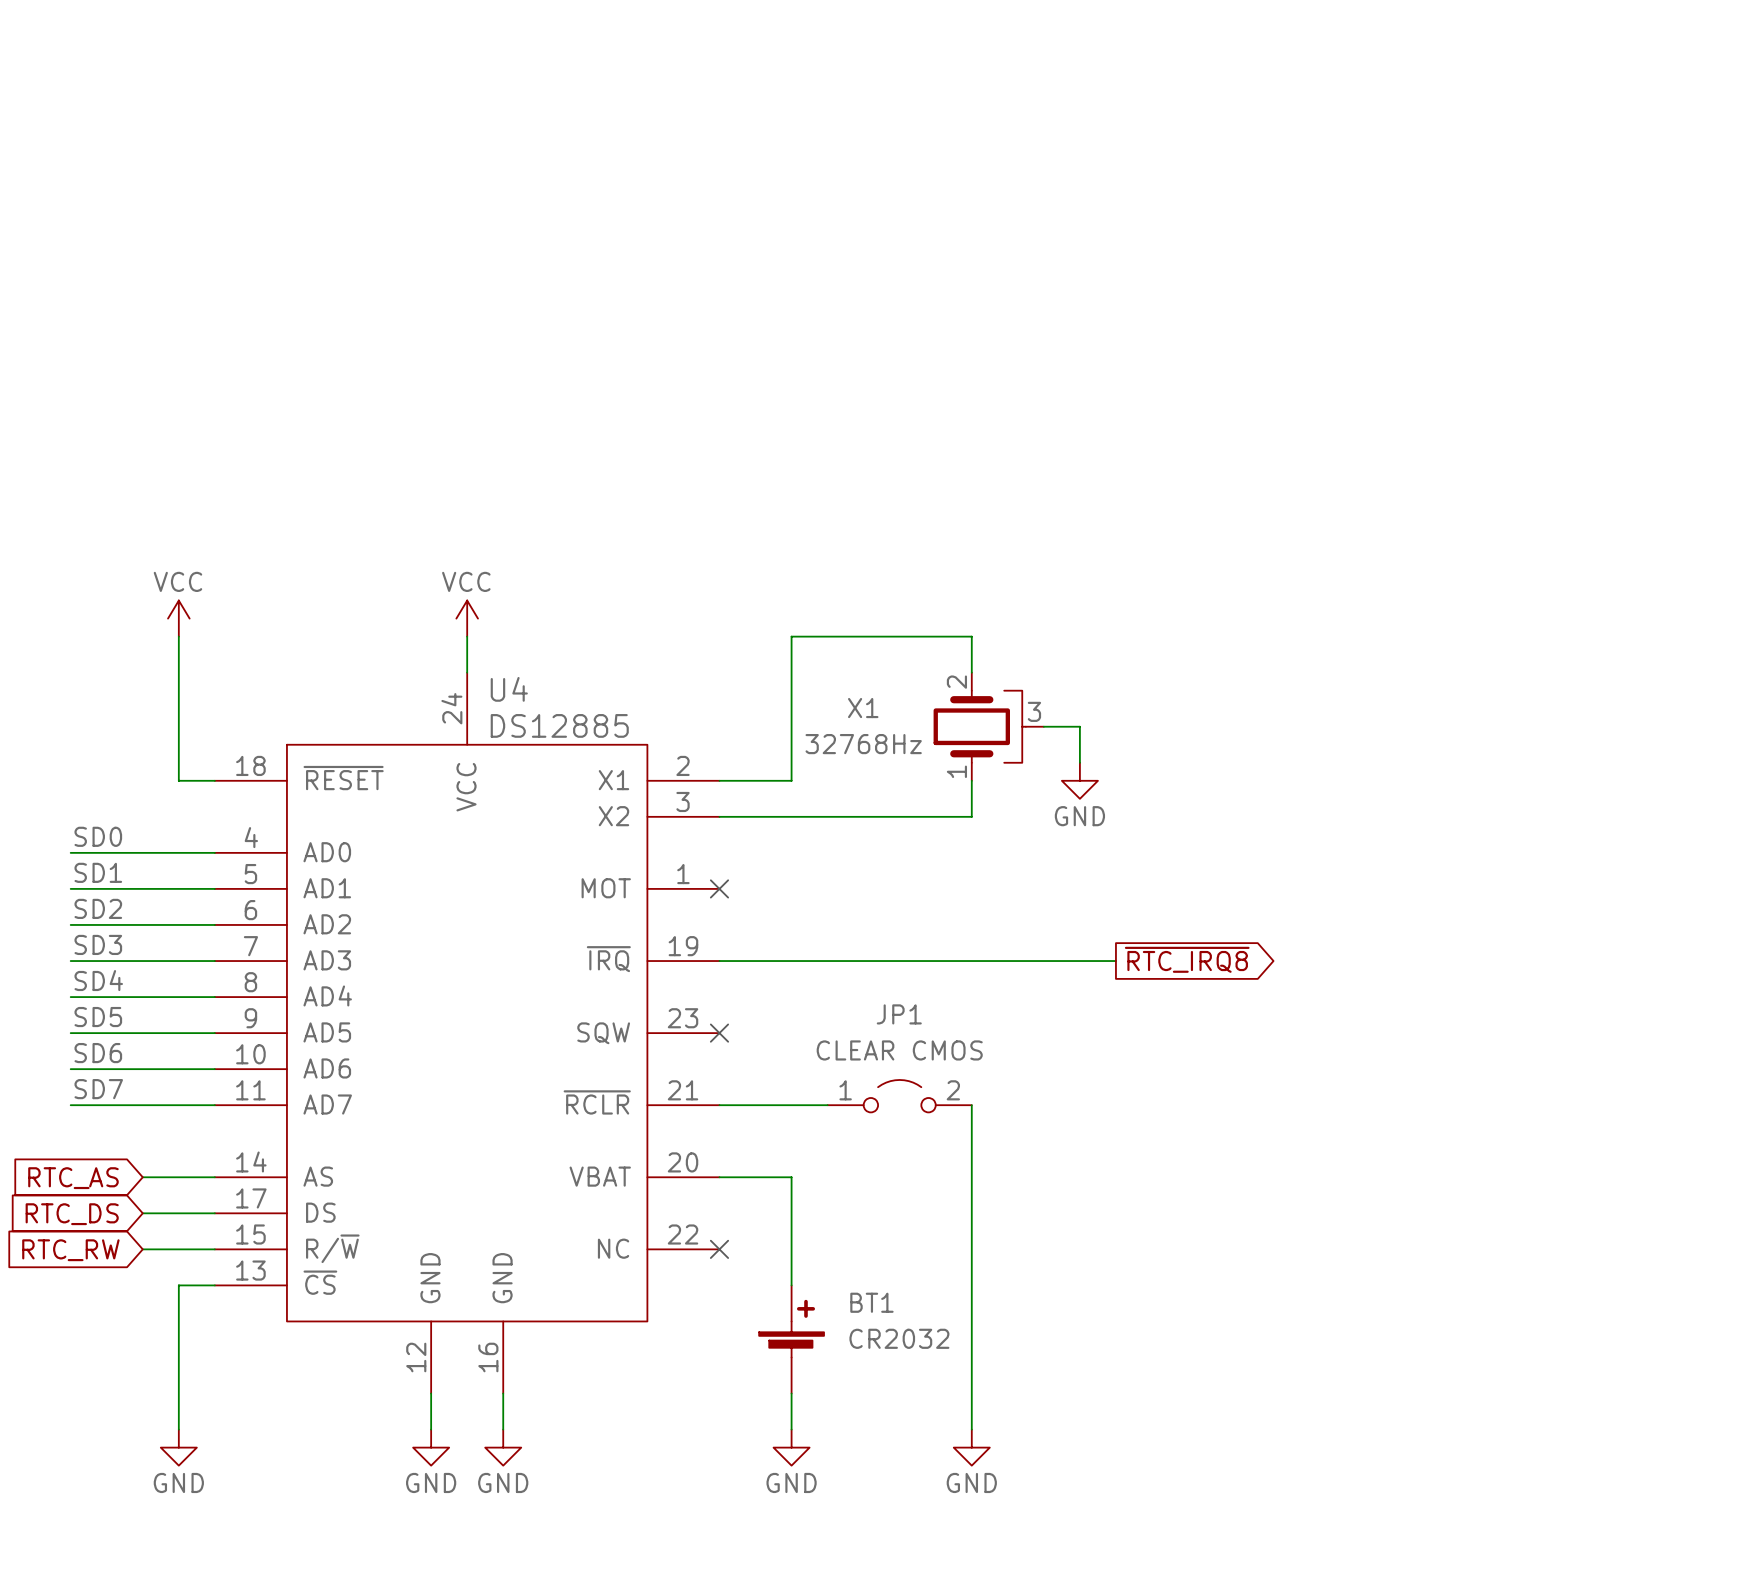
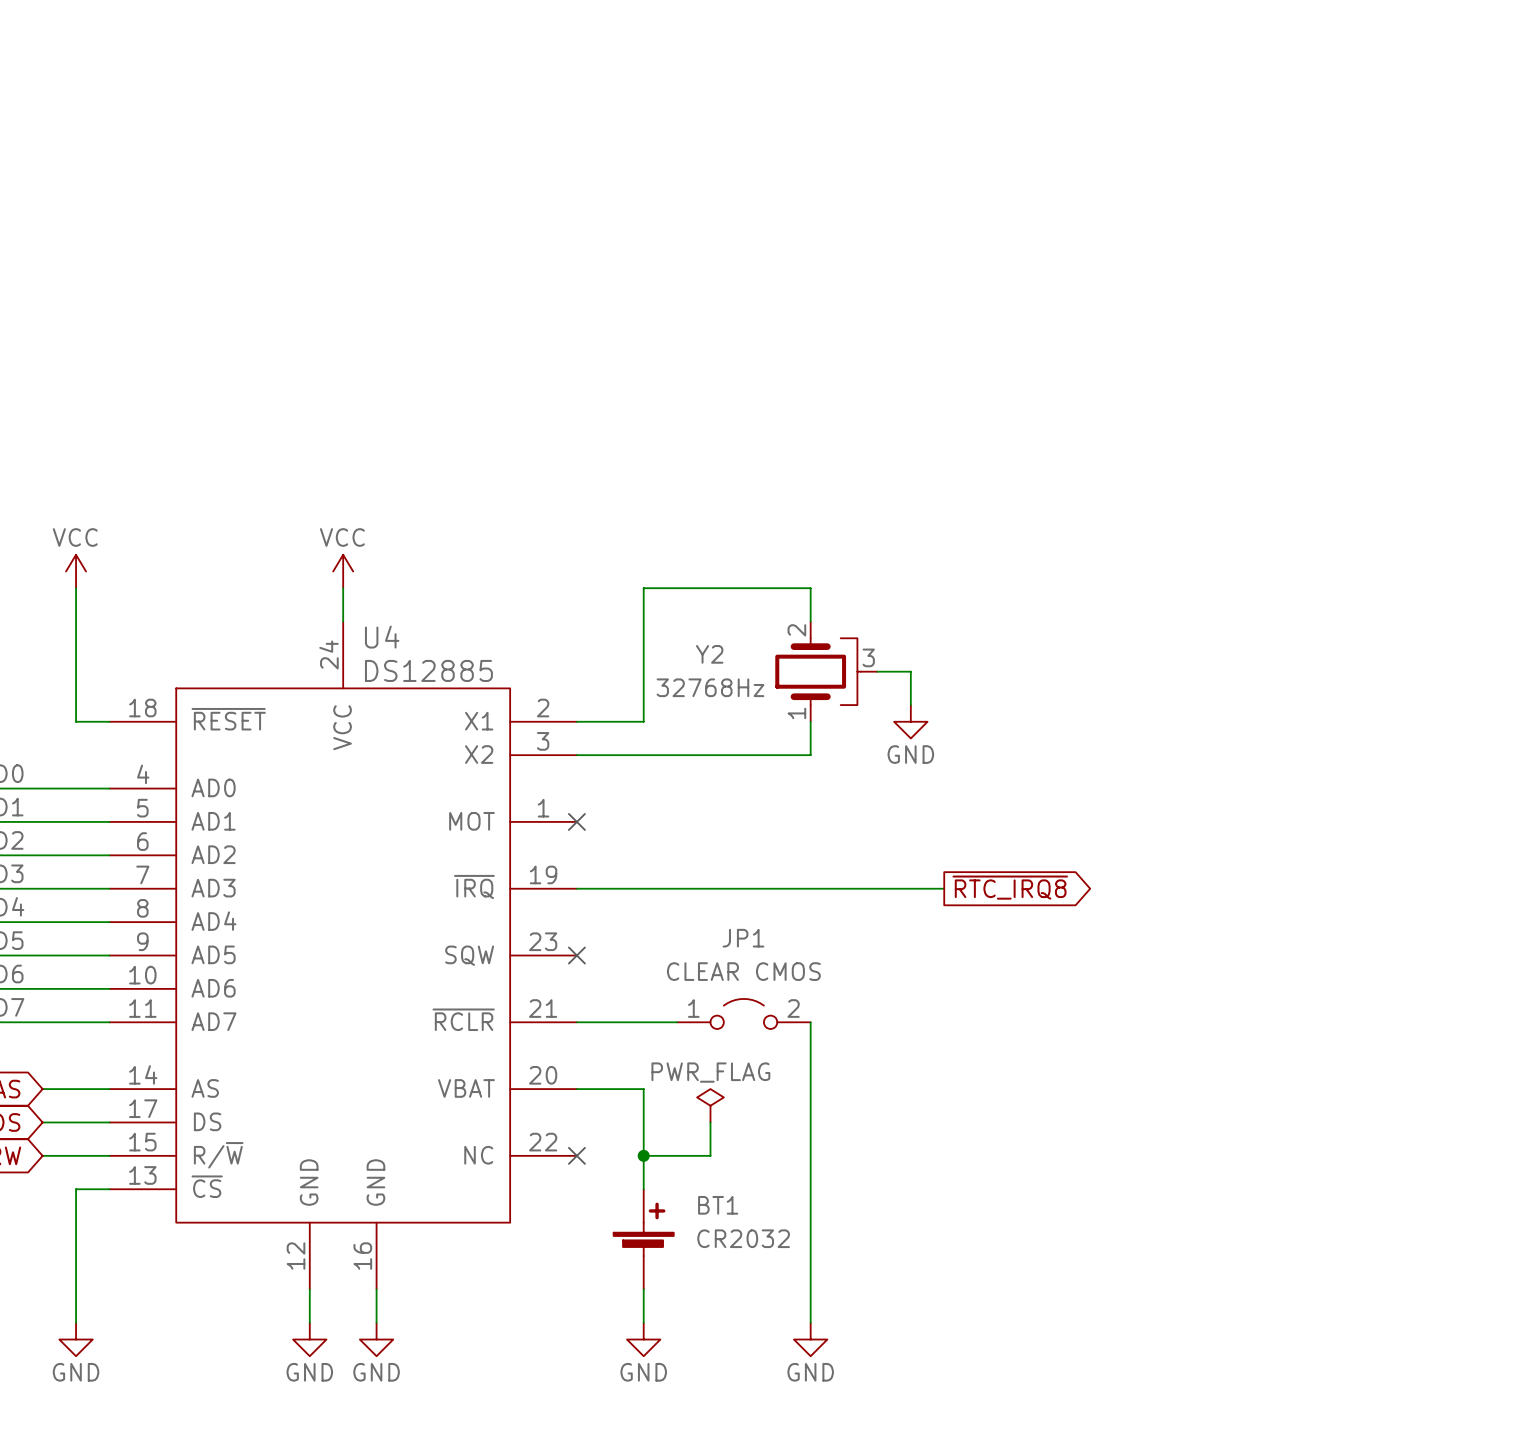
X1 name: X1 (863, 708) -> Y2 (709, 654)
power symbol: none -> PWR_FLAG (710, 1105)
wire: none -> (710, 1122) (710, 1155) (643, 1155)
junction: none -> (643, 1155)

